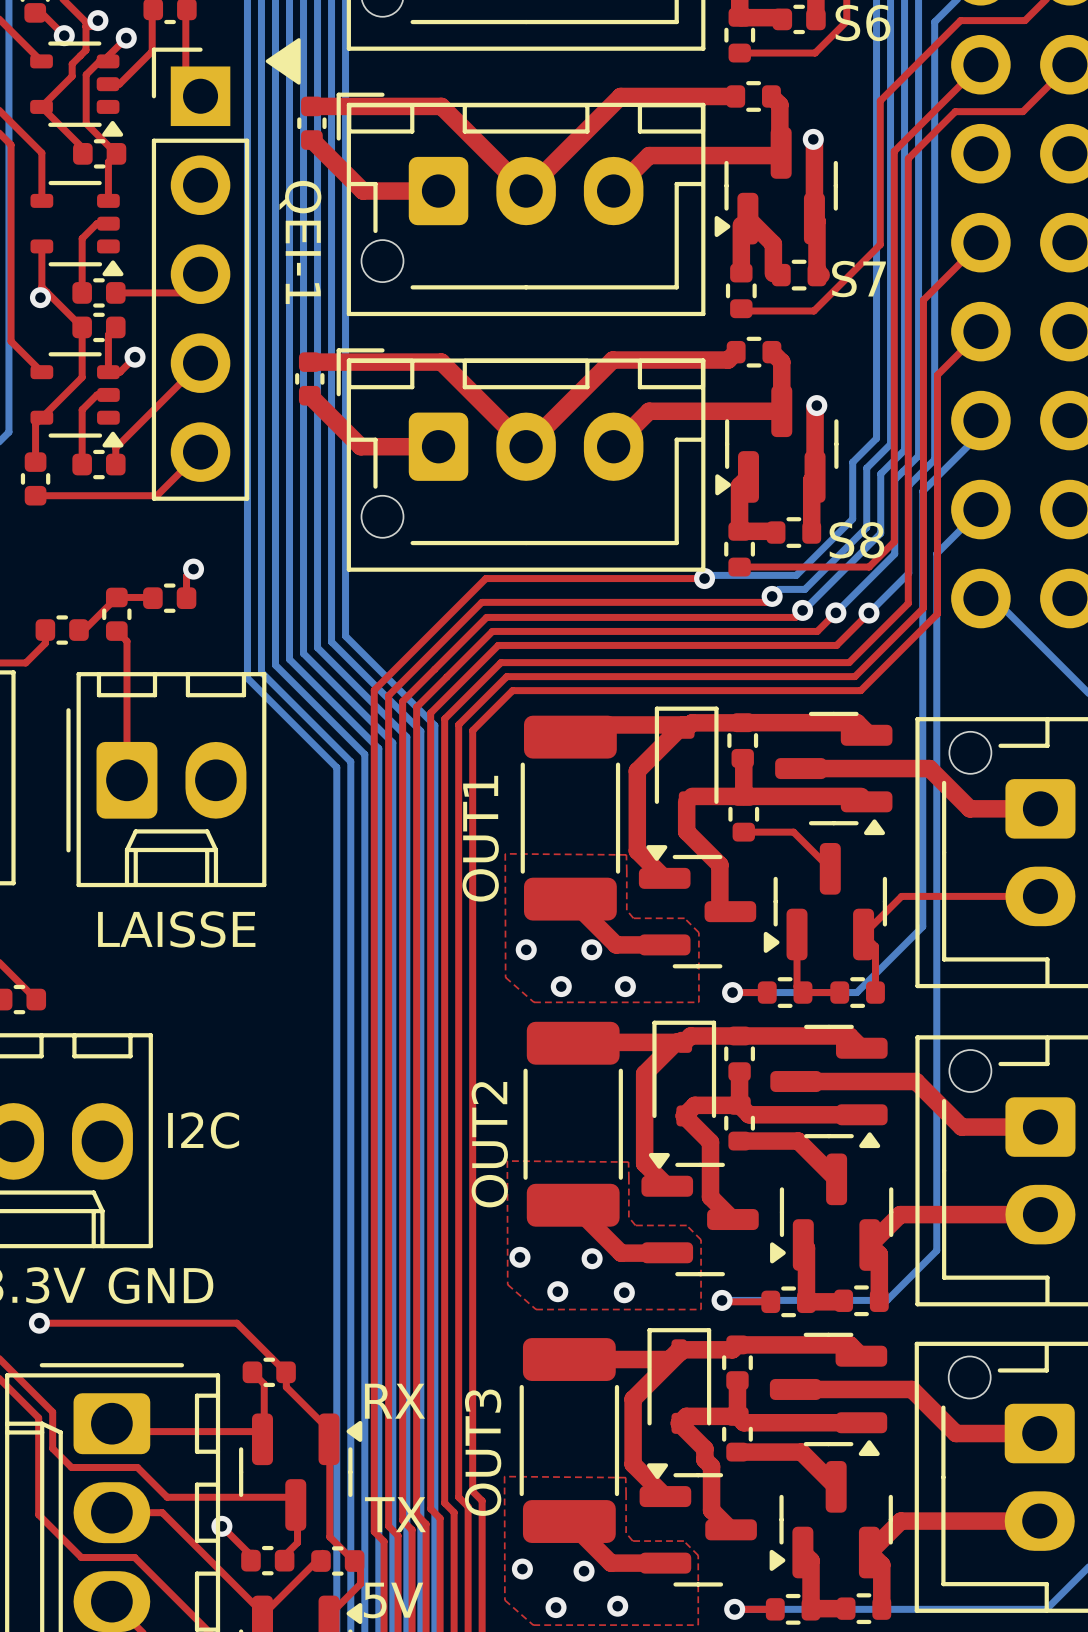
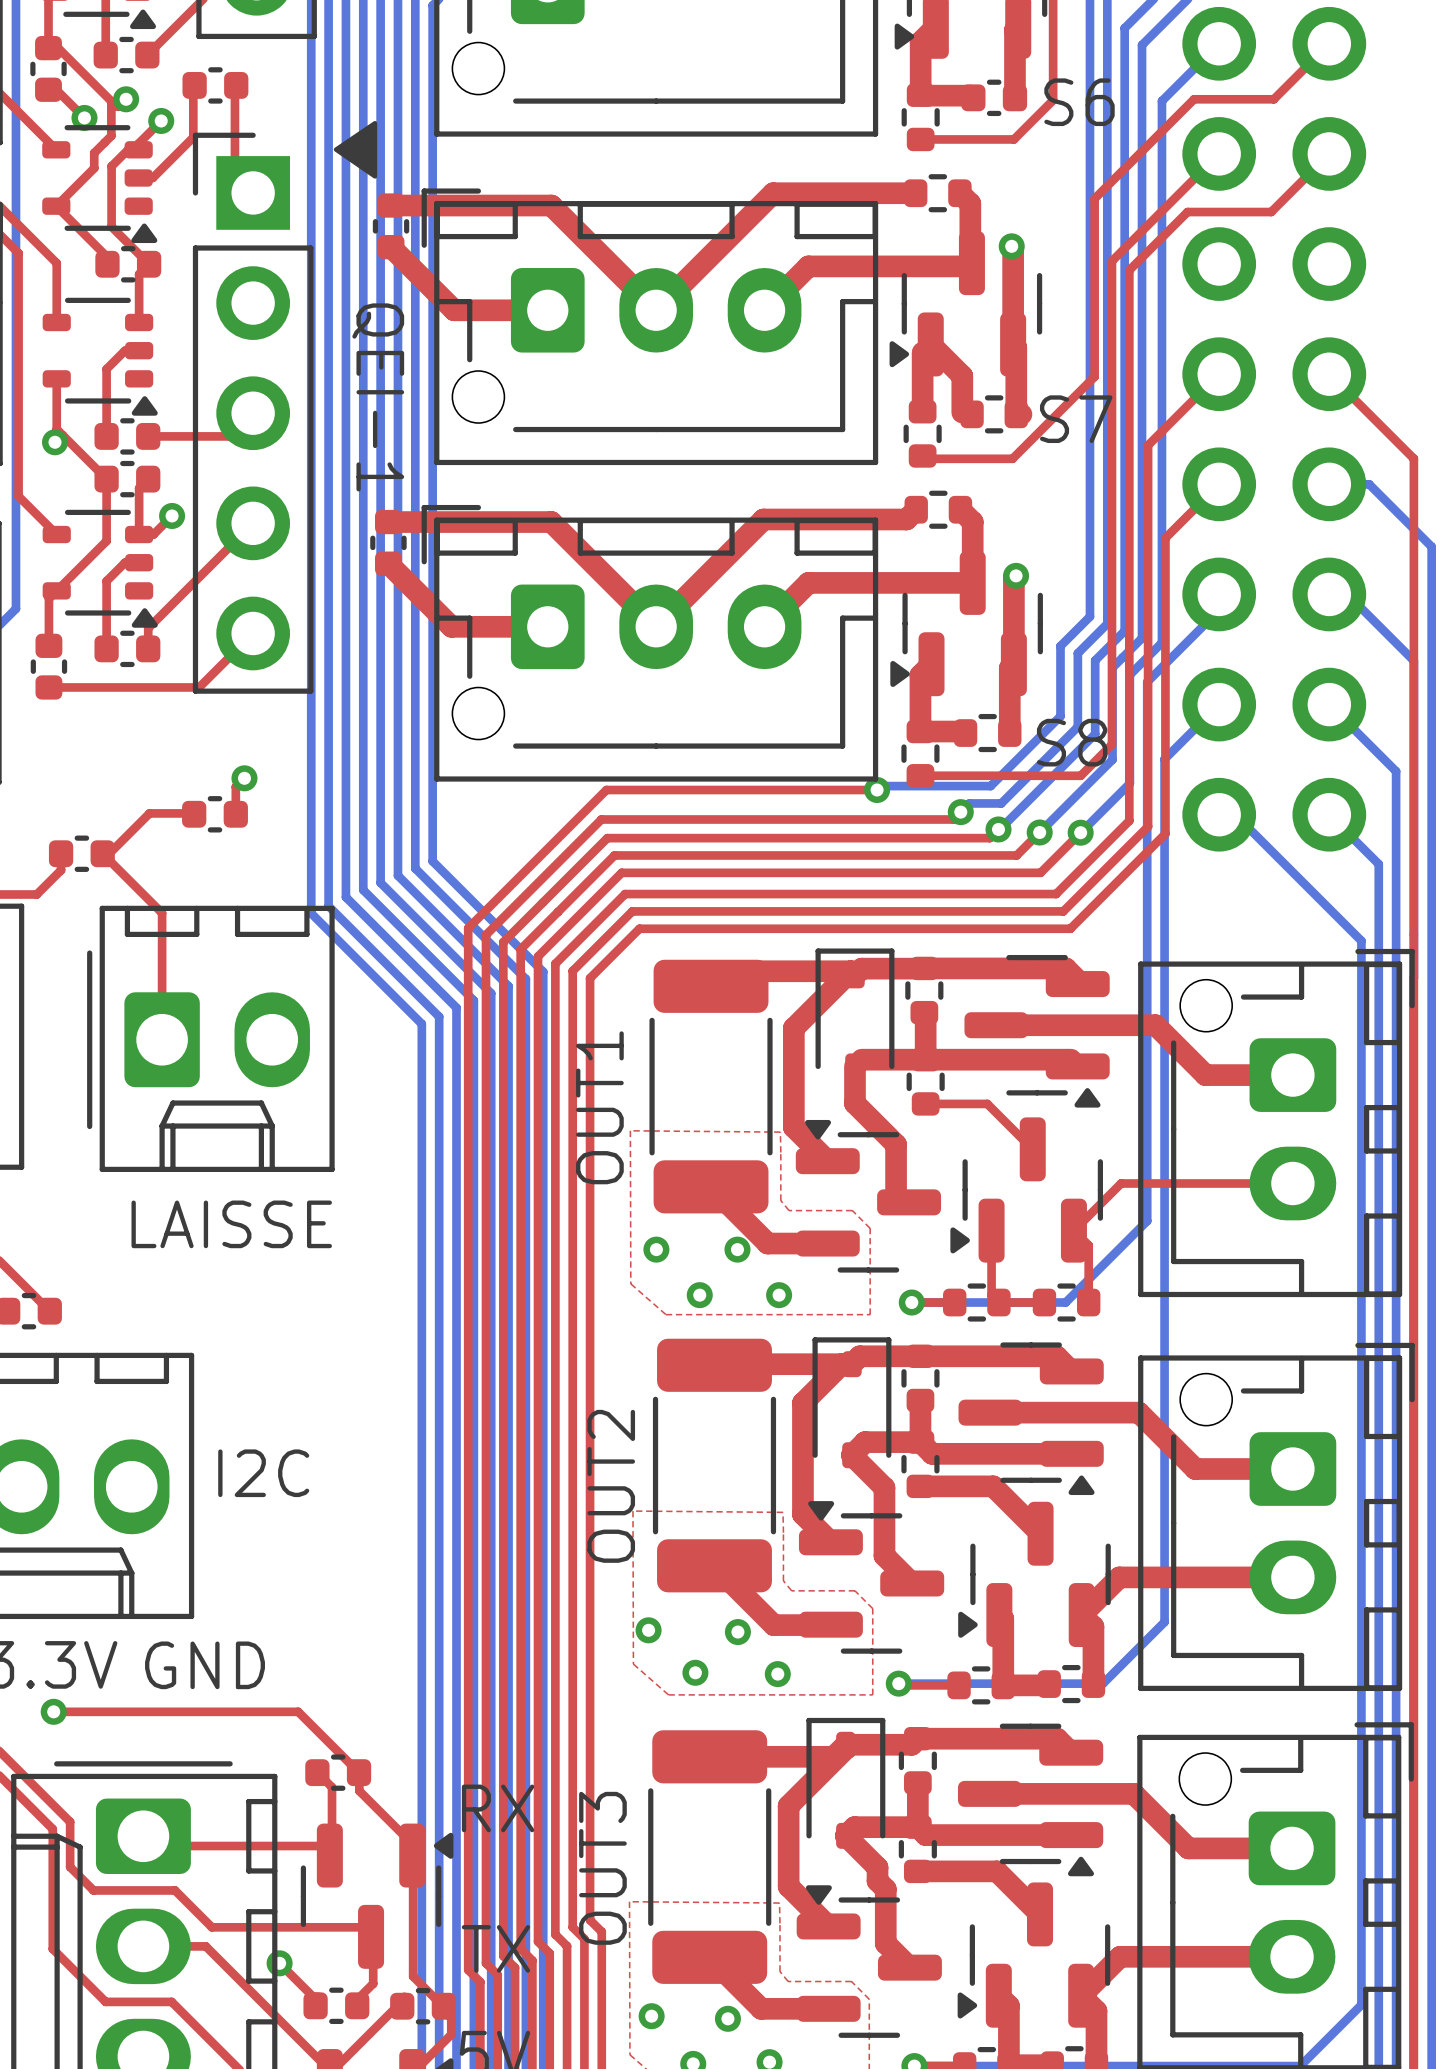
part: (116, 614) -> none
top track: (116, 631) (126, 641) (126, 678) -> (102, 853) (162, 913)

